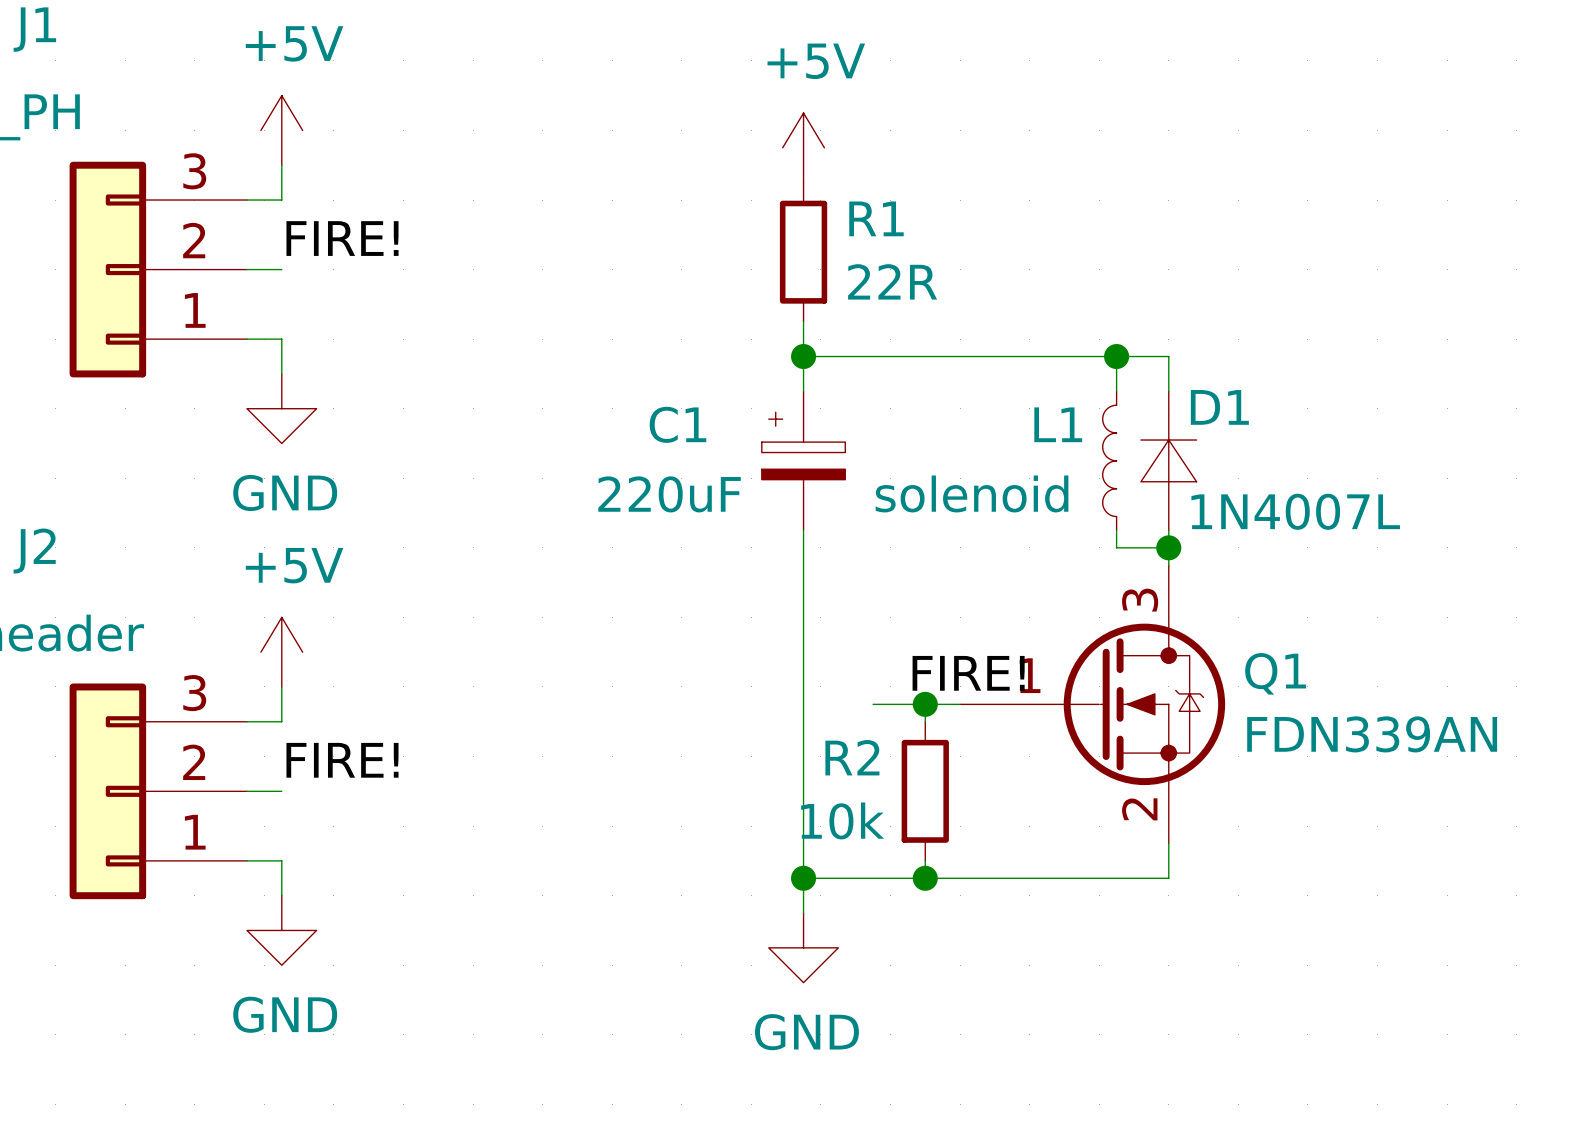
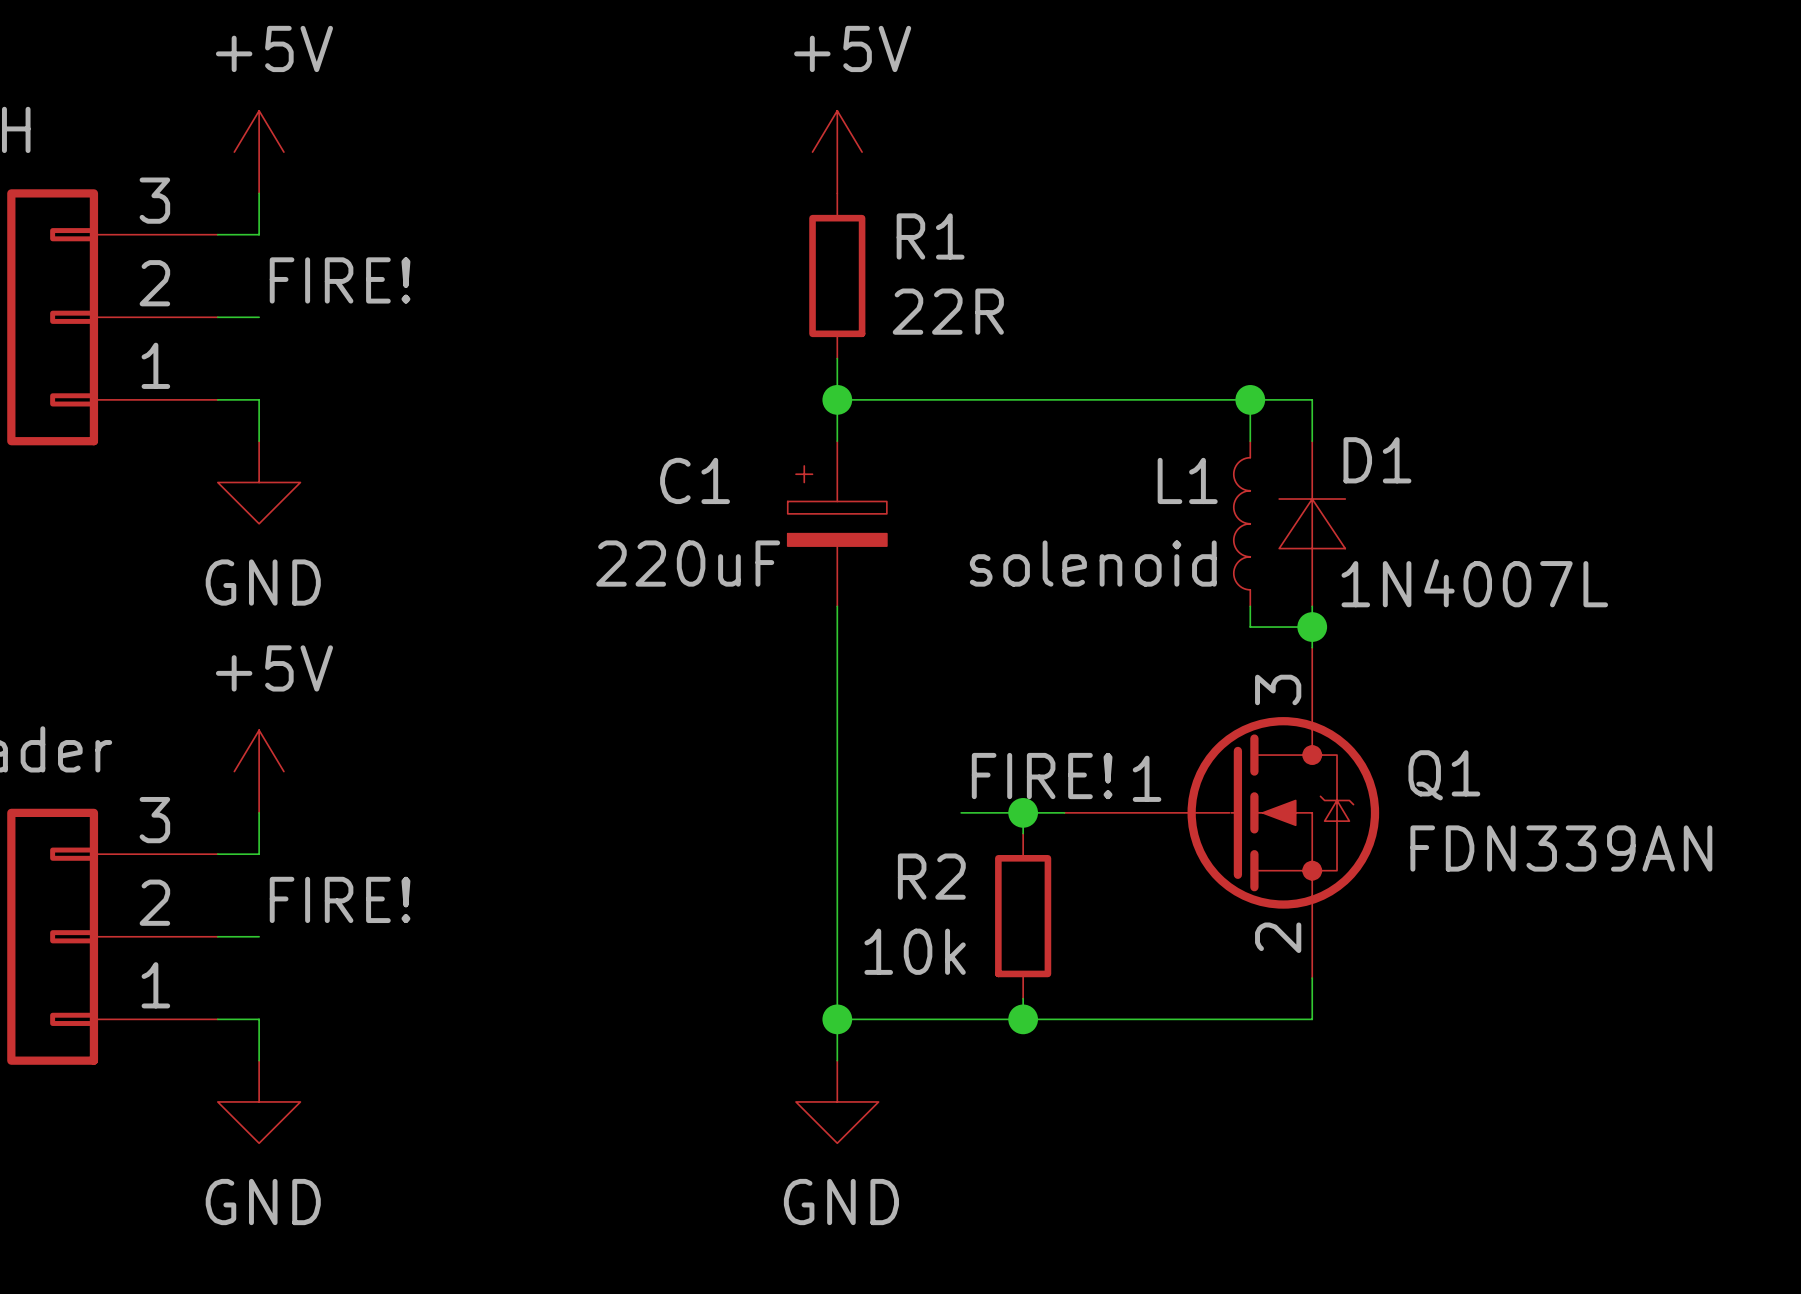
power symbol position: +5V (803, 147) -> +5V (837, 152)
R1 position: (803, 252) -> (837, 275)
wire: (803, 321) (803, 391) -> (837, 358) (837, 441)
wire: (803, 356) (1168, 356) -> (837, 399) (1312, 399) (1312, 420)
junction position: (803, 356) -> (837, 399)
junction position: (1116, 356) -> (1250, 399)
C1 position: (803, 460) -> (837, 523)
L1 position: (1109, 460) -> (1242, 523)
D1 position: (1168, 460) -> (1312, 523)
wire: none -> (1250, 606) (1250, 627) (1312, 627) (1312, 606)
wire: (803, 530) (803, 913) -> (837, 606) (837, 1060)
wire: (1116, 530) (1116, 547) (1168, 547) (1168, 565) -> none
junction position: (1168, 547) -> (1312, 627)
label position: FIRE! (968, 673) -> FIRE! (1042, 776)
wire: (873, 704) (960, 704) -> (961, 812) (1064, 812)
junction position: (925, 704) -> (1023, 812)
Q1 position: (1092, 704) -> (1221, 812)
R2 position: (925, 791) -> (1023, 916)
wire: (1168, 860) (1168, 878) (803, 878) -> (1312, 1019) (837, 1019)
junction position: (803, 878) -> (837, 1019)
junction position: (925, 878) -> (1023, 1019)
power symbol position: GND (803, 947) -> GND (837, 1101)

